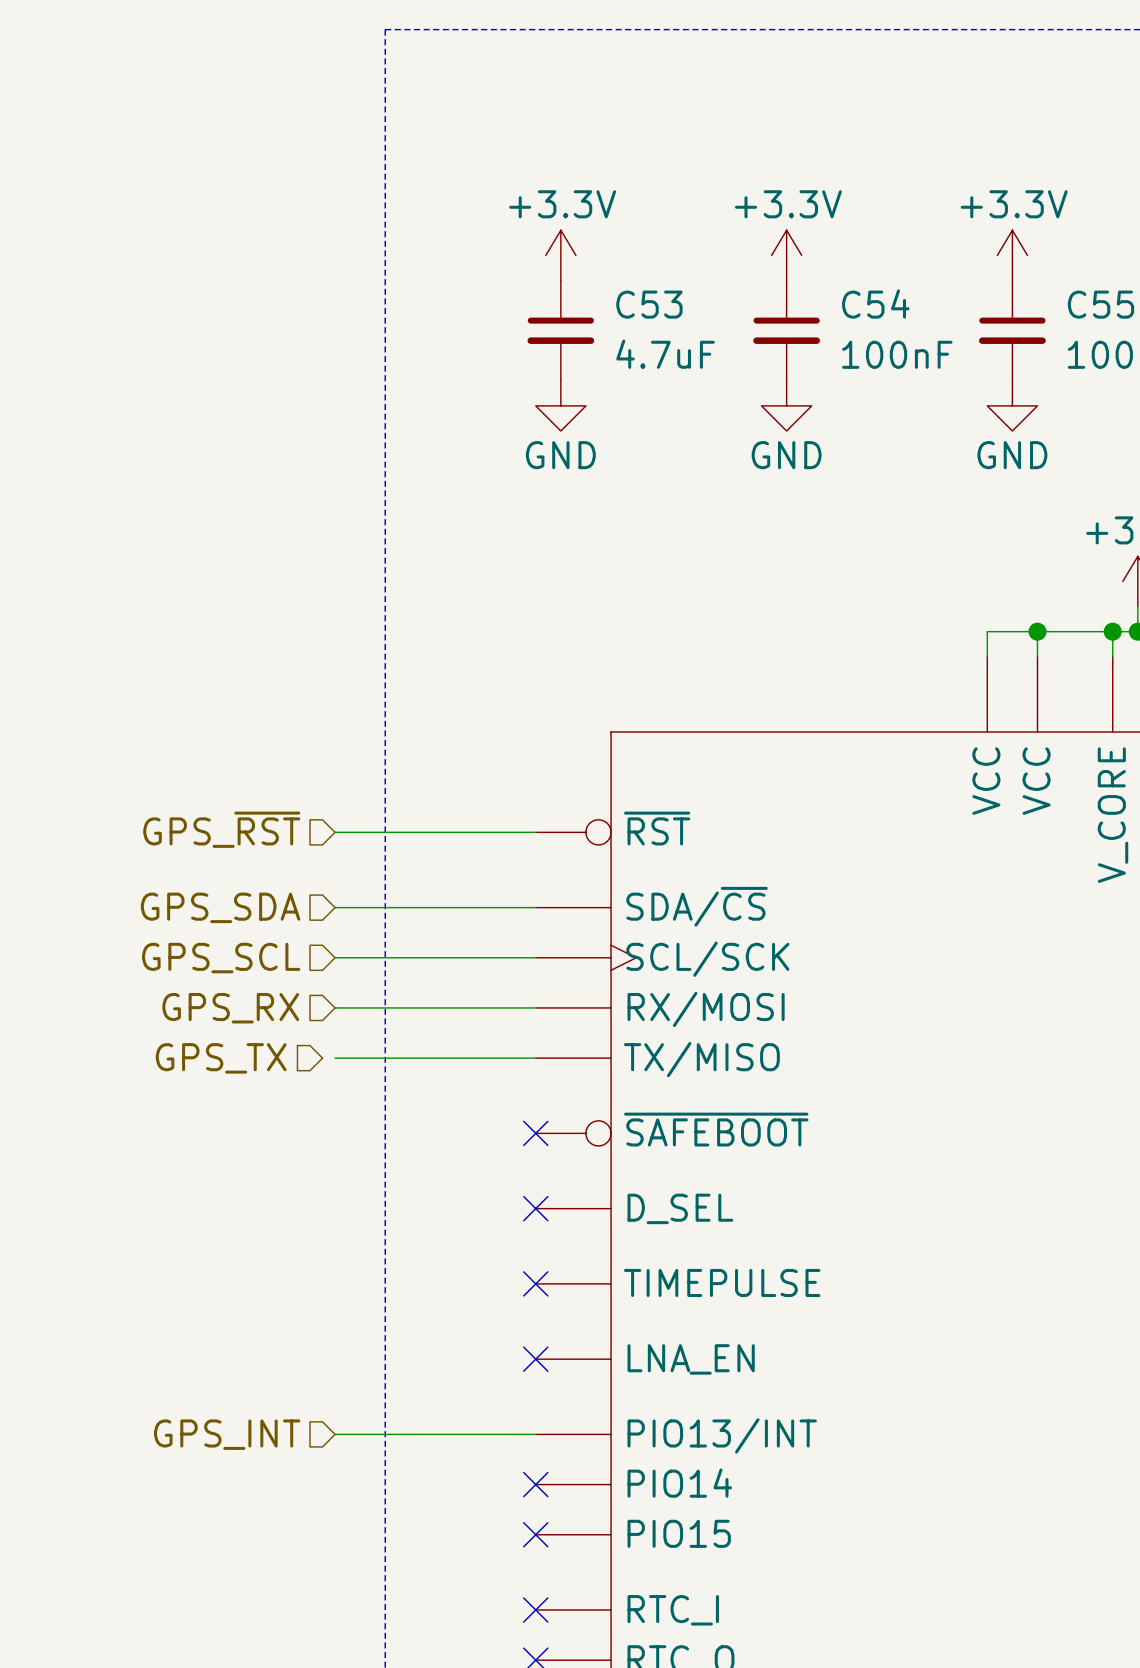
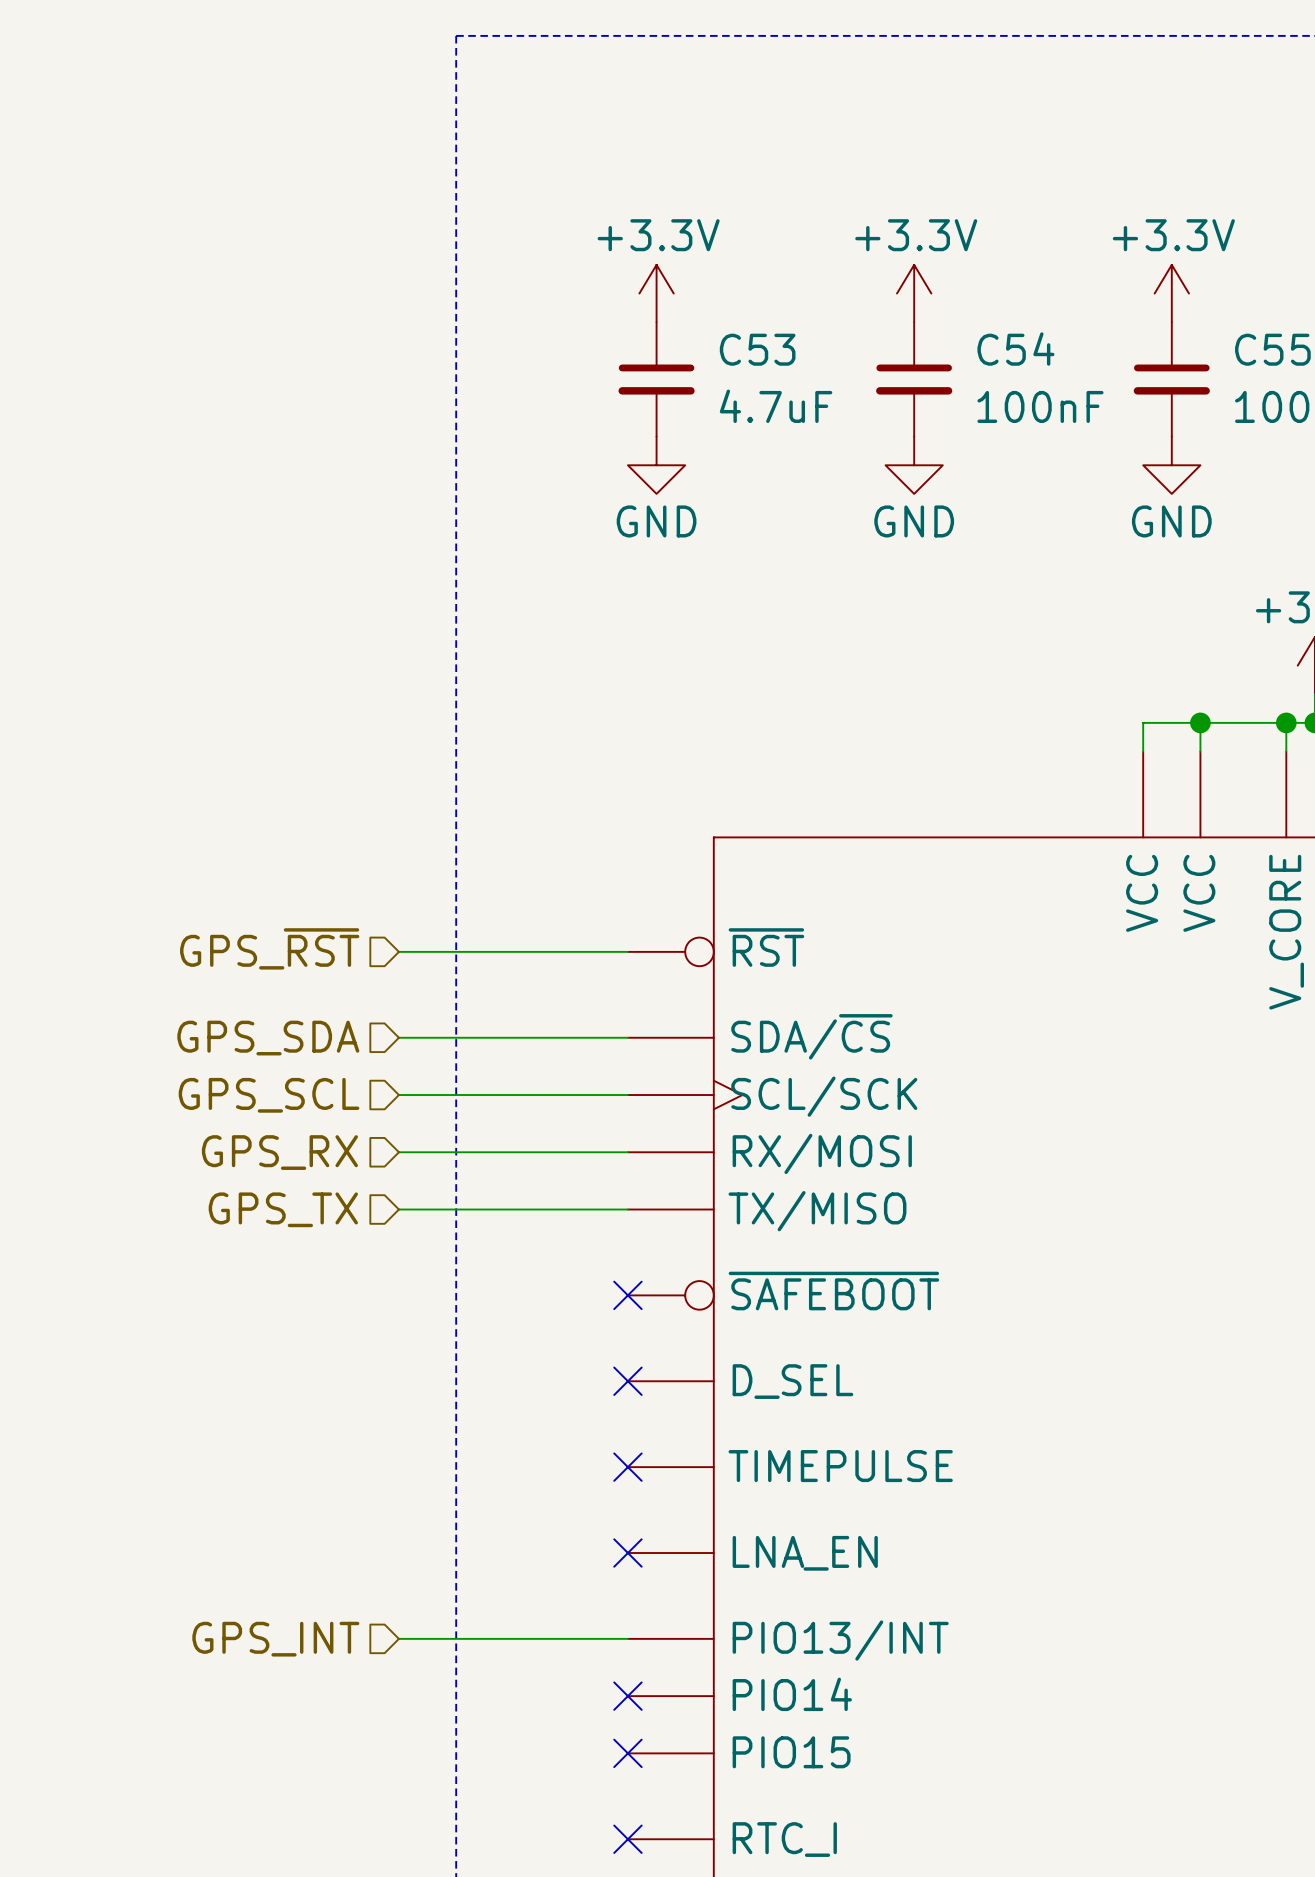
hierarchical label position: GPS_TX (221, 1058) -> GPS_TX (283, 1209)

